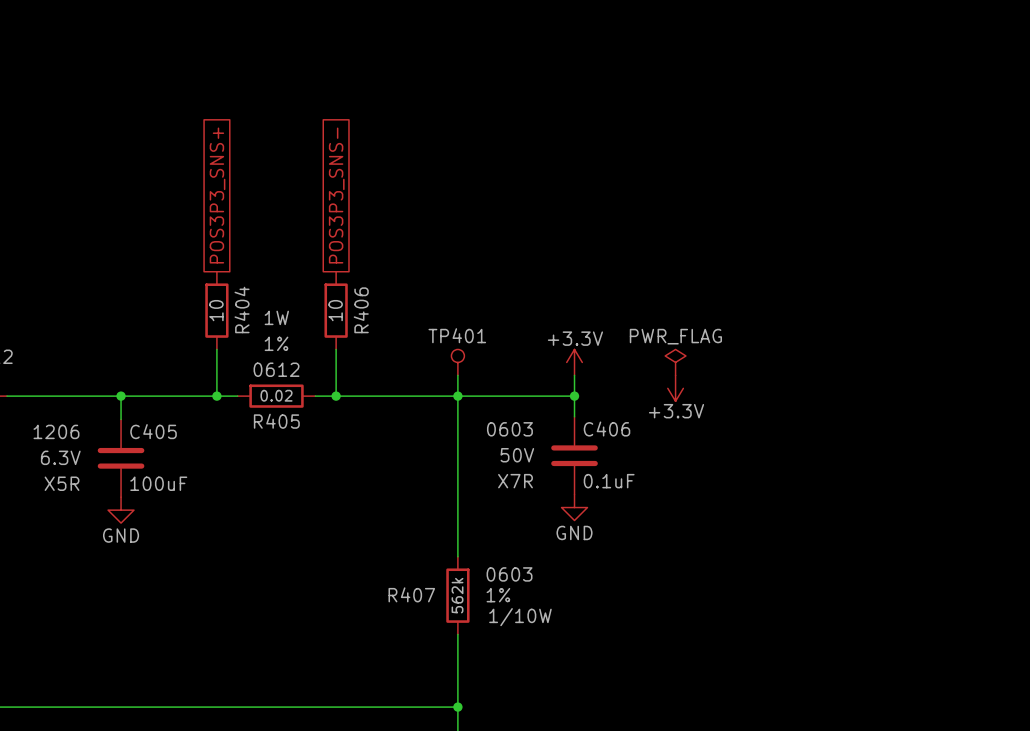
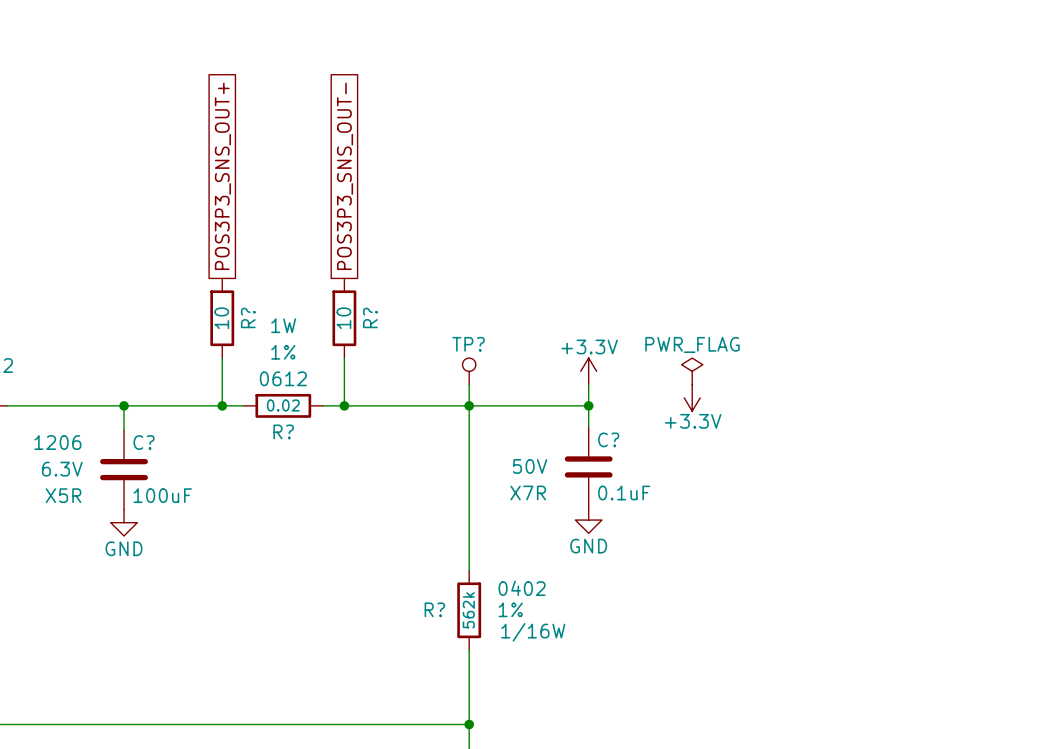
global label: POS3P3_SNS+ (217, 195) -> POS3P3_SNS_OUT+ (222, 176)
global label: POS3P3_SNS- (336, 195) -> POS3P3_SNS_OUT- (345, 176)
R404 name: R404 (242, 309) -> R? (248, 317)
R406 name: R406 (361, 310) -> R? (370, 317)
TP401 name: TP401 (457, 335) -> TP? (468, 344)
R405 name: R405 (276, 421) -> R? (283, 431)
C406 text: 0603 (509, 429) -> none
C406 name: C406 (607, 429) -> C? (608, 439)
C405 name: C405 (153, 431) -> C? (144, 442)
R407 text: 0603 (509, 574) -> 0402 (522, 588)
R407 name: R407 (411, 594) -> R? (434, 609)
R407 text: 1/10W (520, 617) -> 1/16W (533, 632)

